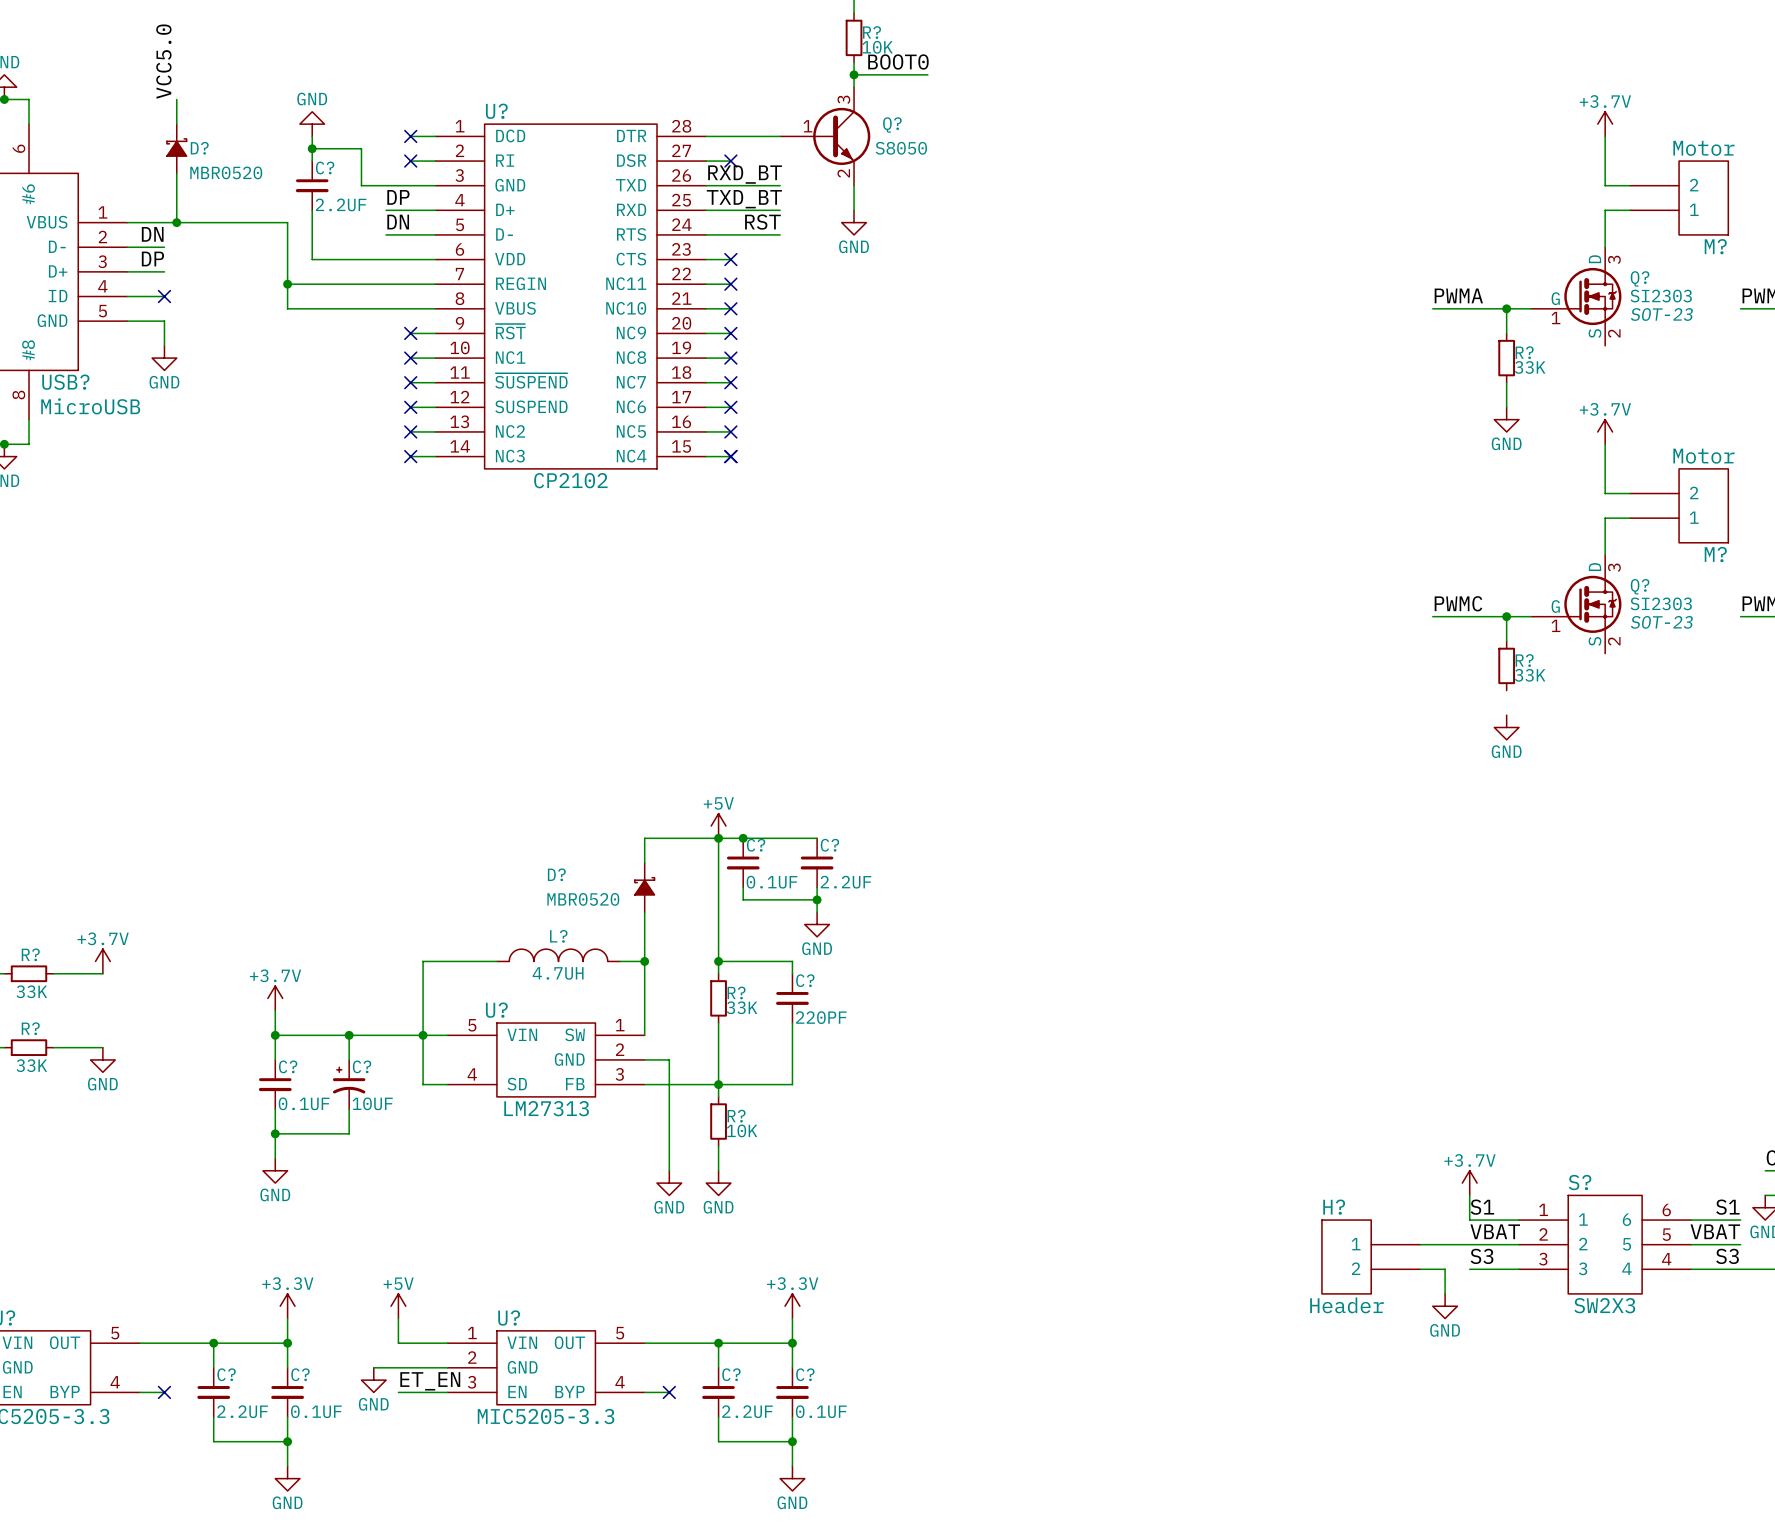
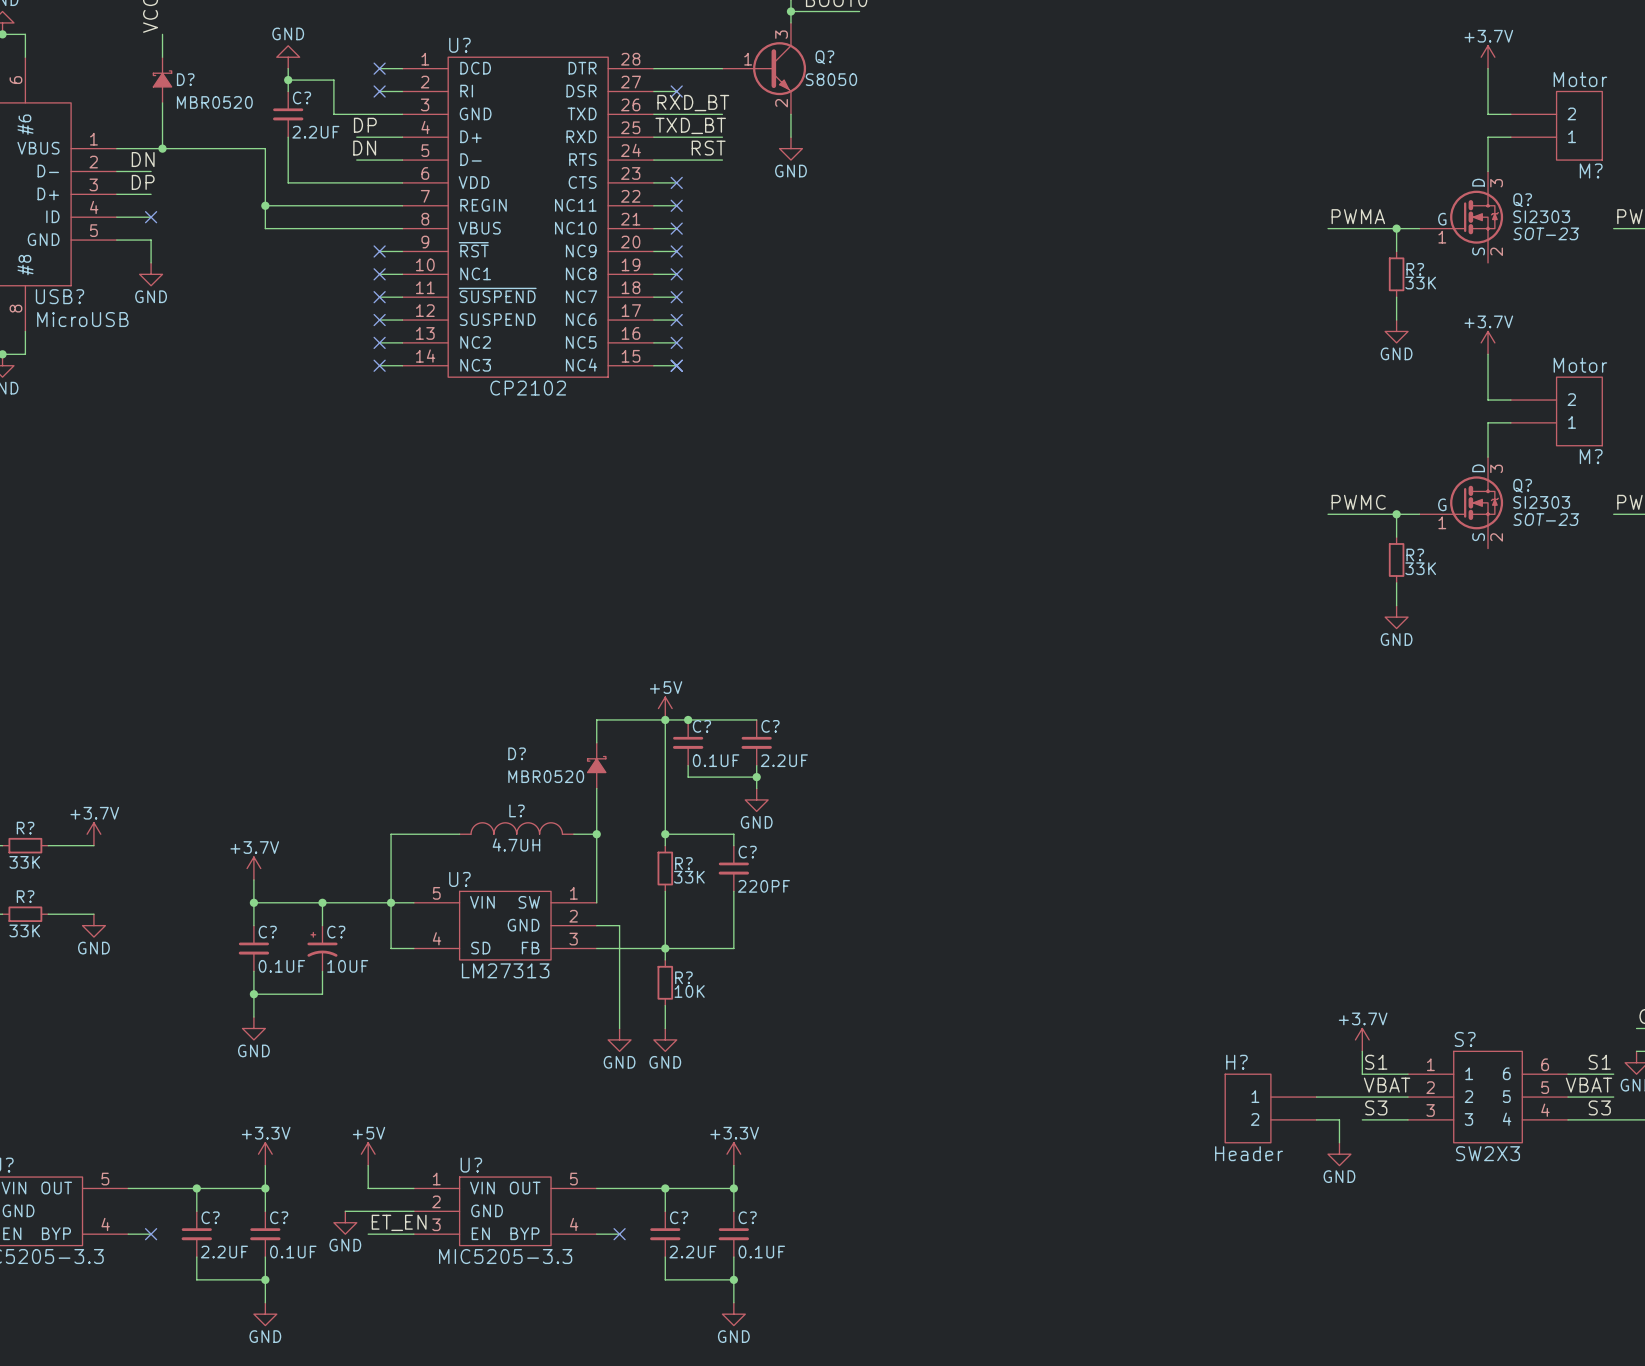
wire: none -> (1396, 582) (1396, 605)

